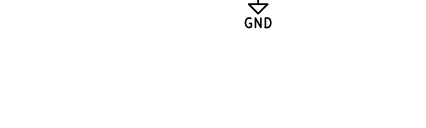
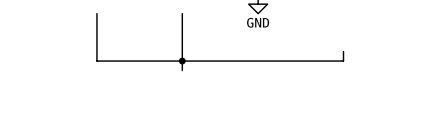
wire: none -> (96, 13) (96, 61) (343, 61) (343, 51)
wire: none -> (182, 13) (182, 70)
junction: none -> (182, 61)

